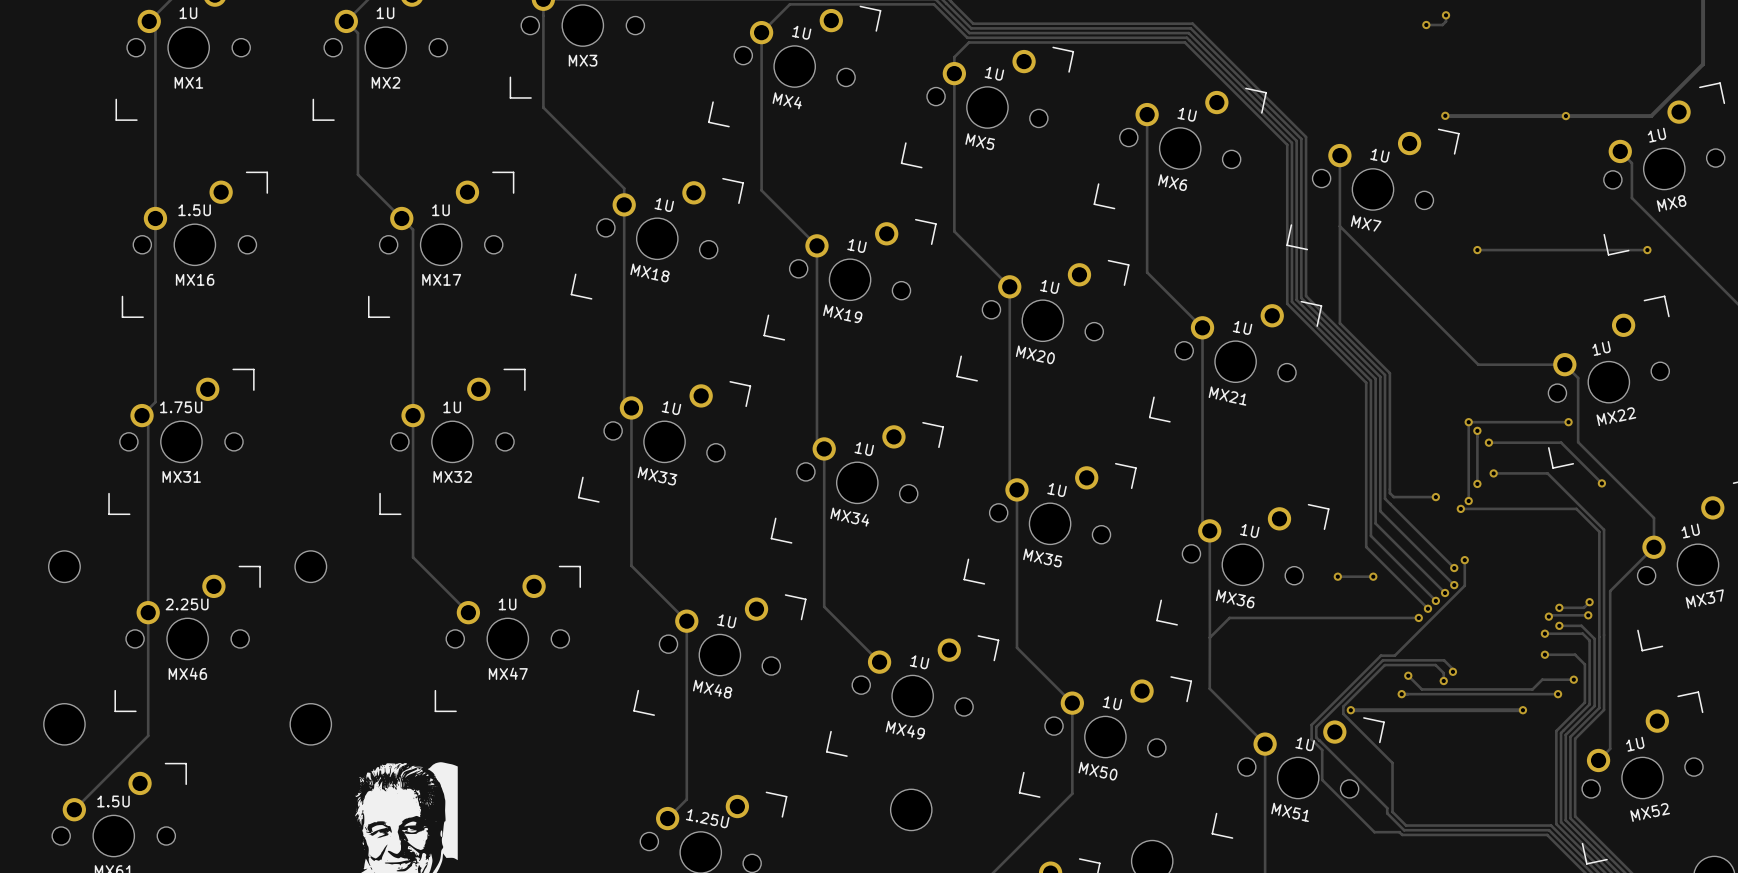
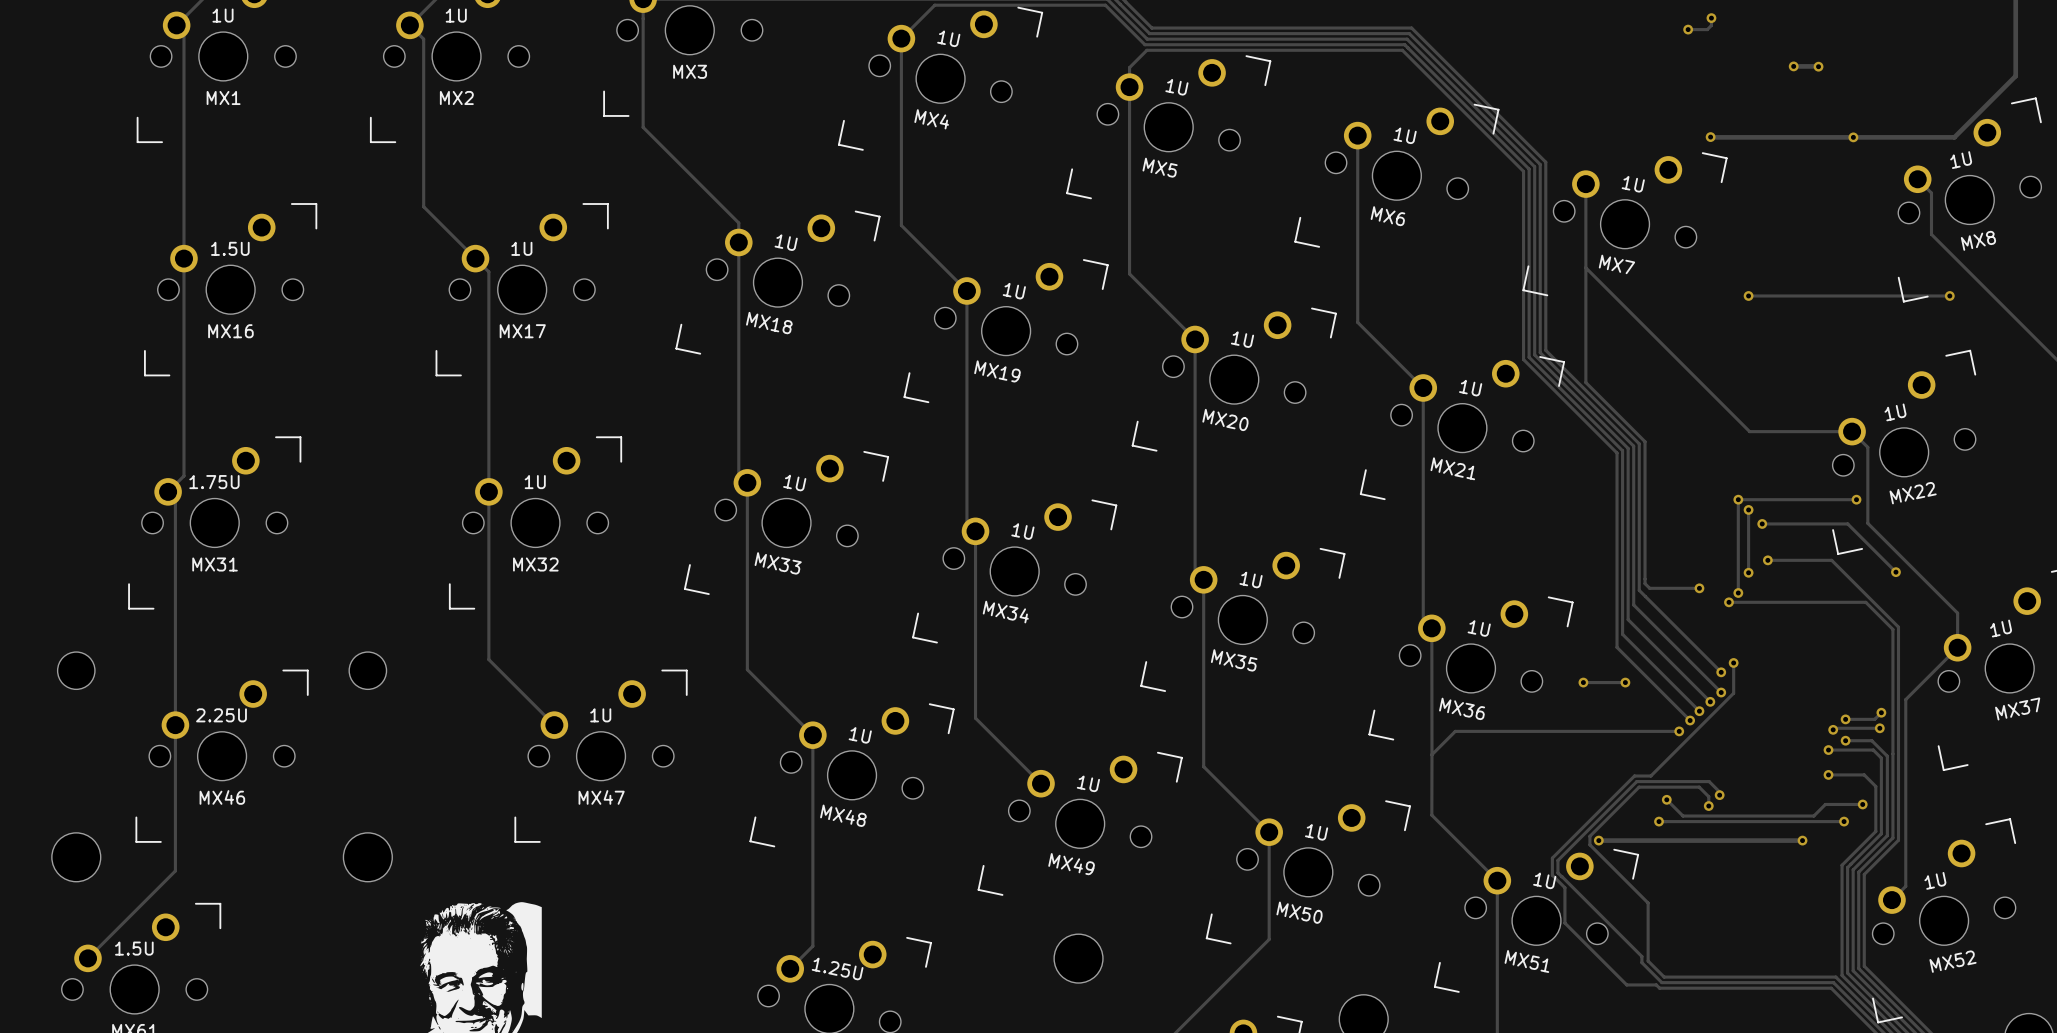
track: none -> (1793, 66) (1818, 66)
via: none -> (1793, 66)
via: none -> (1818, 66)

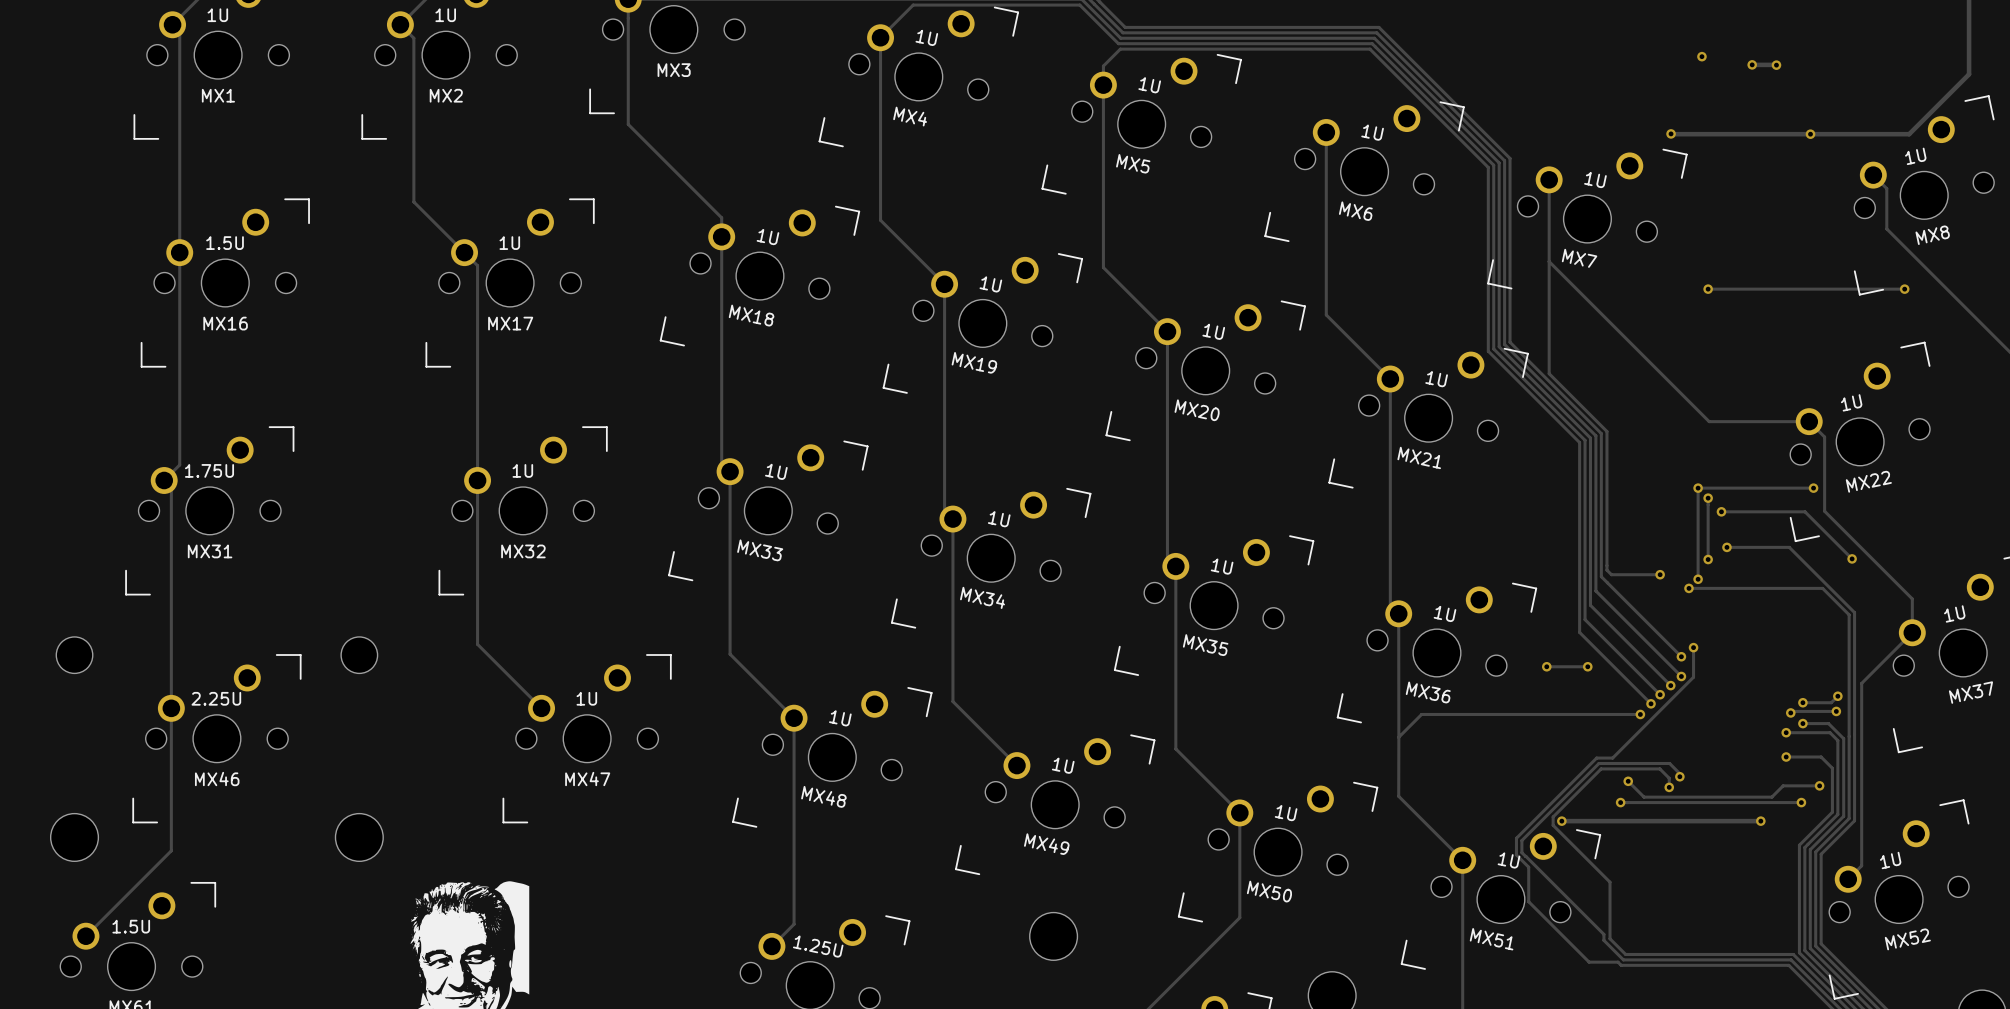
track: (1711, 18) (1711, 25) (1707, 29) (1688, 29) -> none
via: (1711, 18) -> none
via: (1688, 29) -> none
via: none -> (1701, 56)

